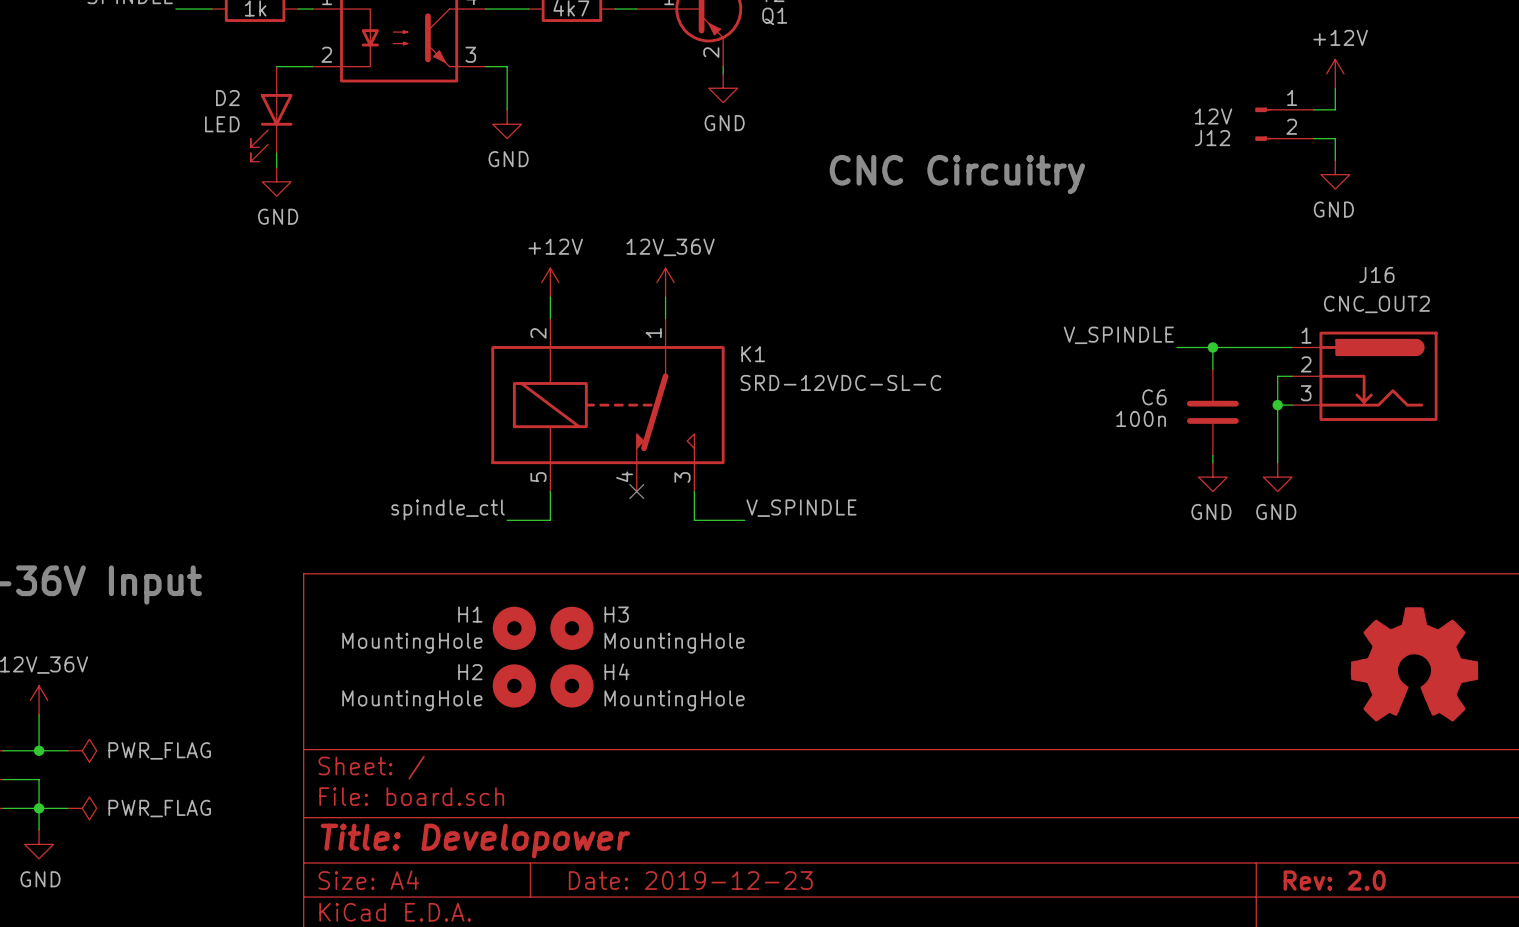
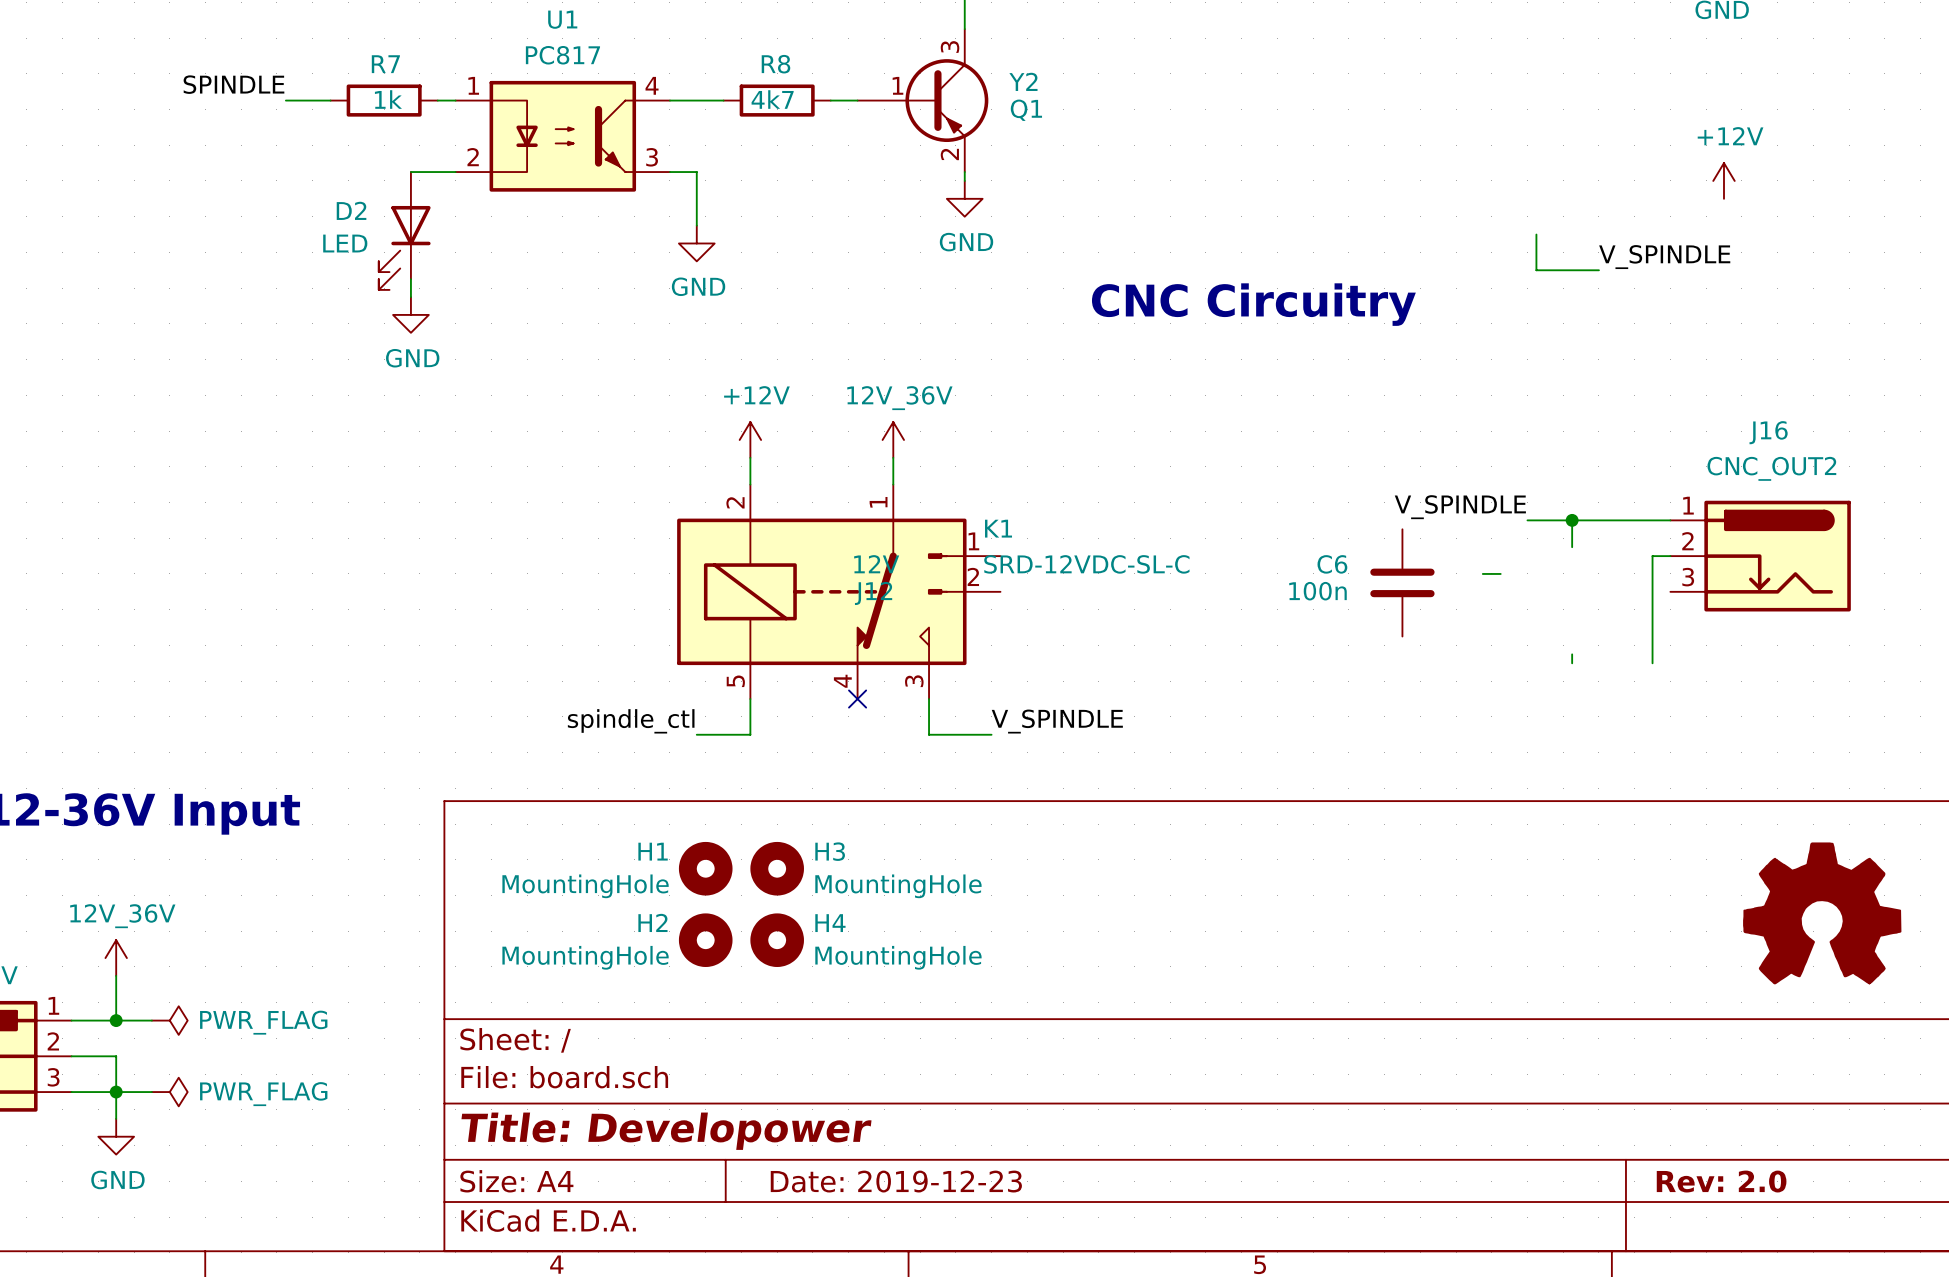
wire: (1335, 88) (1335, 109) (1313, 109) -> none
wire: none -> (1536, 234) (1536, 270) (1598, 270)
J12 position: (1284, 124) -> (964, 573)
label: none -> V_SPINDLE (1664, 257)
wire: (1313, 138) (1335, 138) (1335, 160) -> none
power symbol: GND (1335, 174) -> none
wire: (1277, 405) (1292, 405) -> (1482, 573) (1500, 573)
junction: (1277, 405) -> none
C6 position: (1212, 412) -> (1402, 582)
power symbol: GND (1212, 477) -> none
power symbol: GND (1277, 477) -> none

